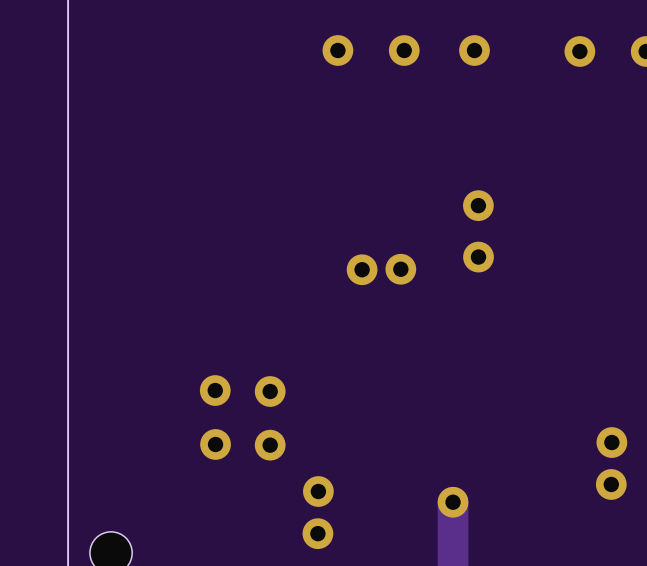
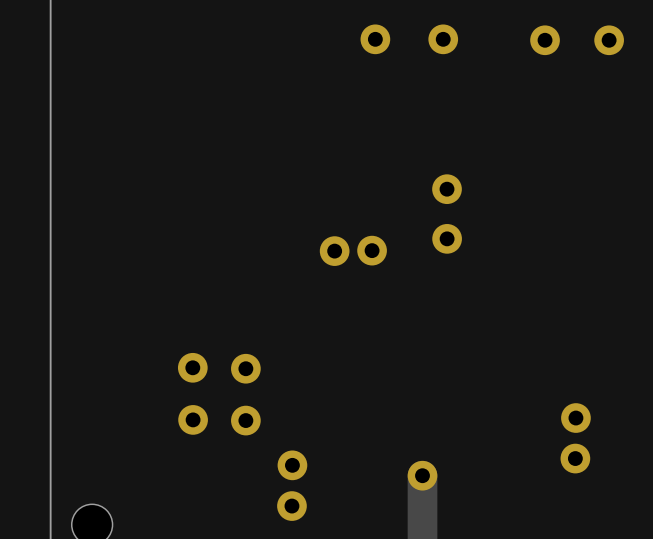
via: (337, 50) -> none

